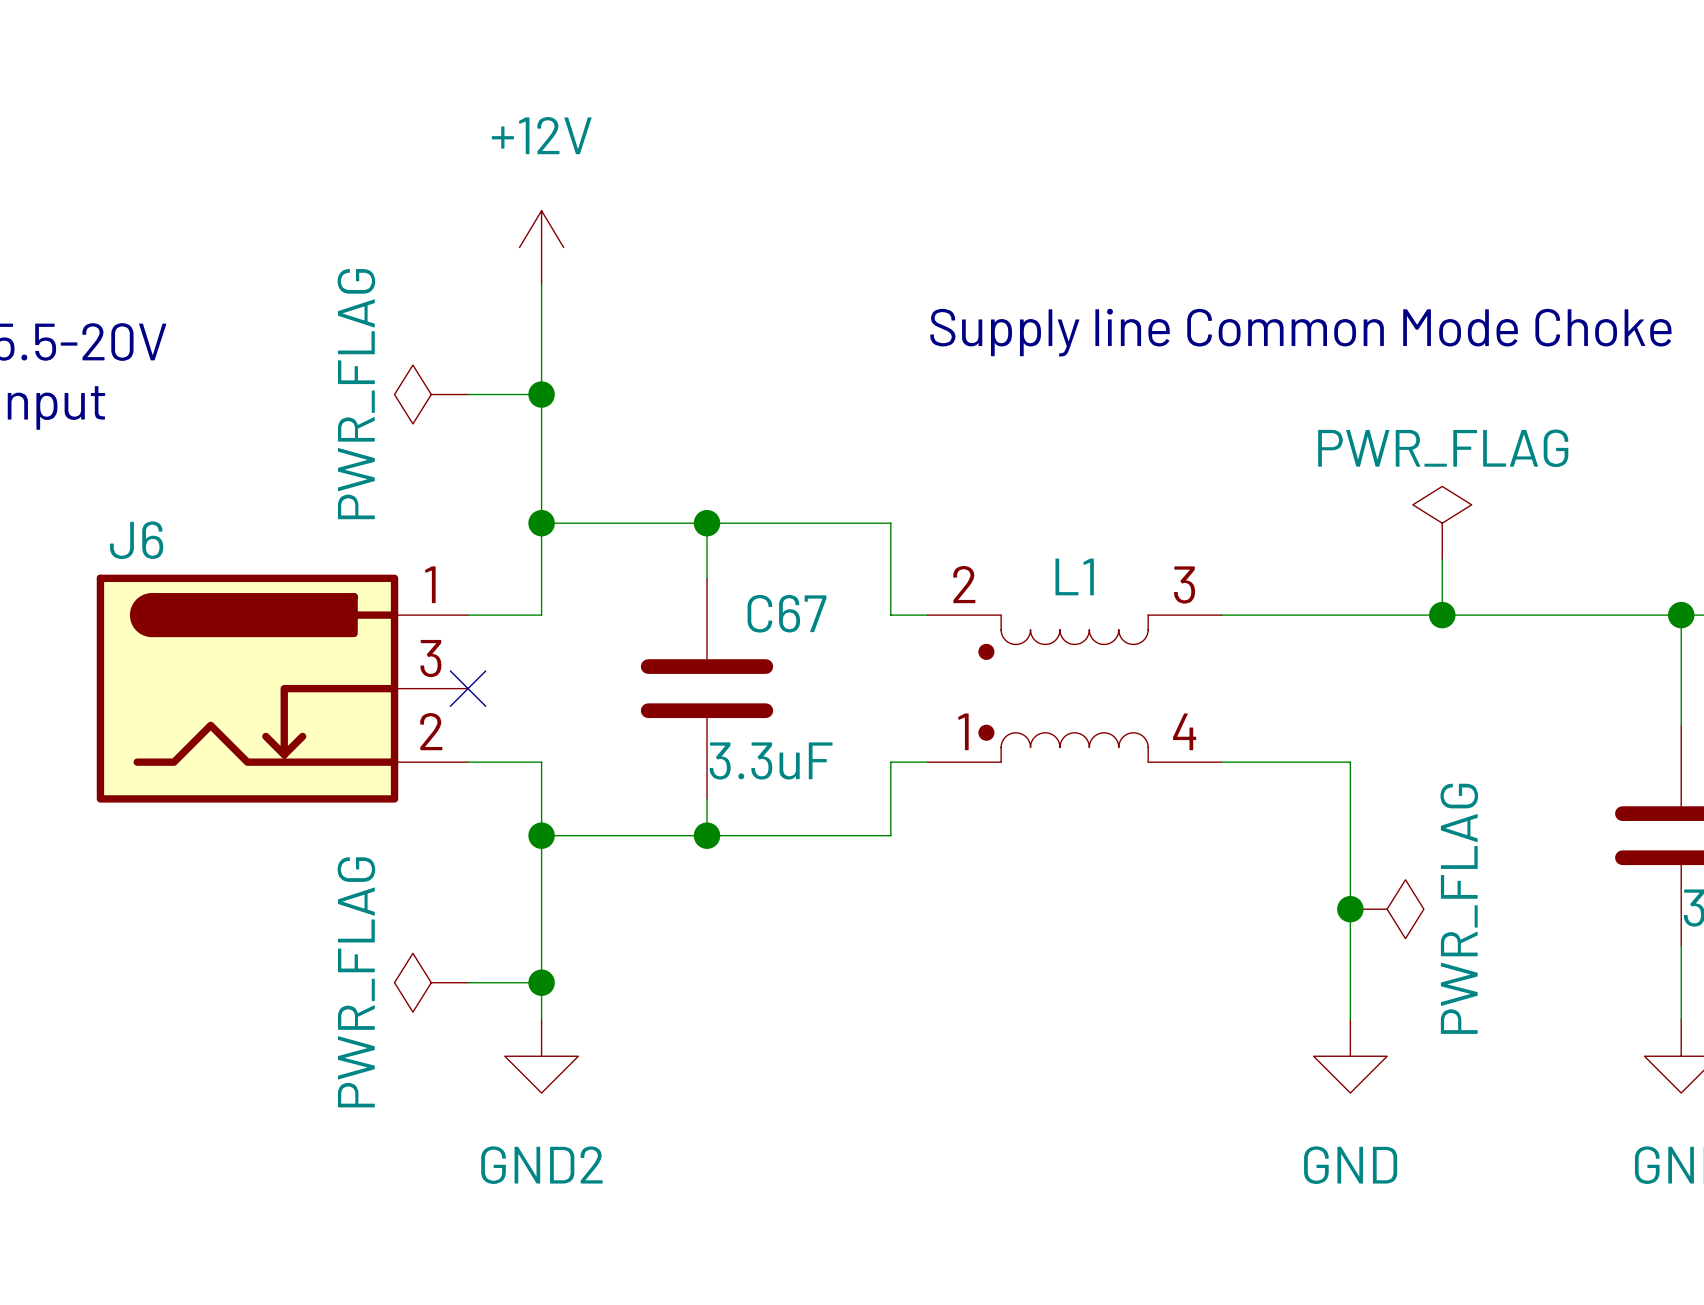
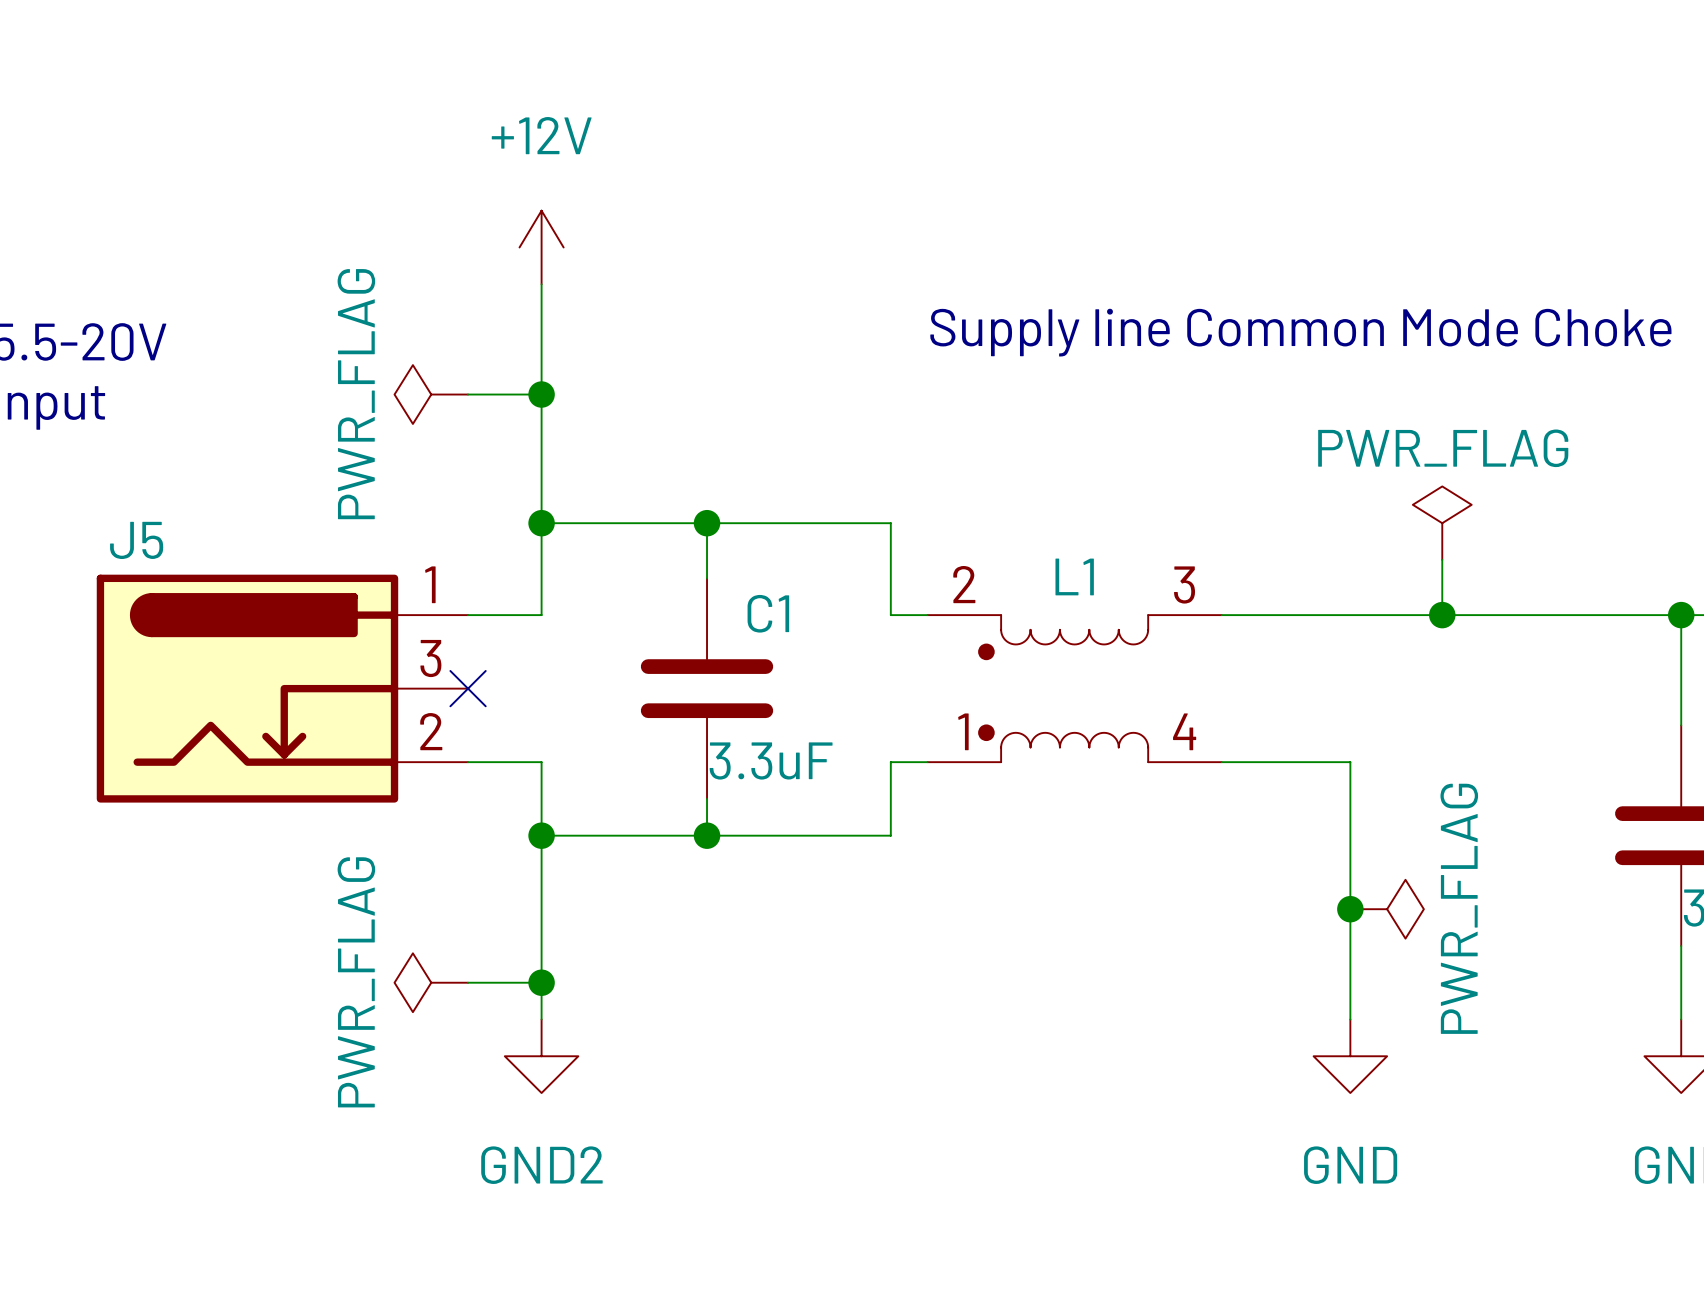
J6 name: J6 (136, 540) -> J5 (136, 540)
C67 name: C67 (786, 613) -> C1 (768, 613)

